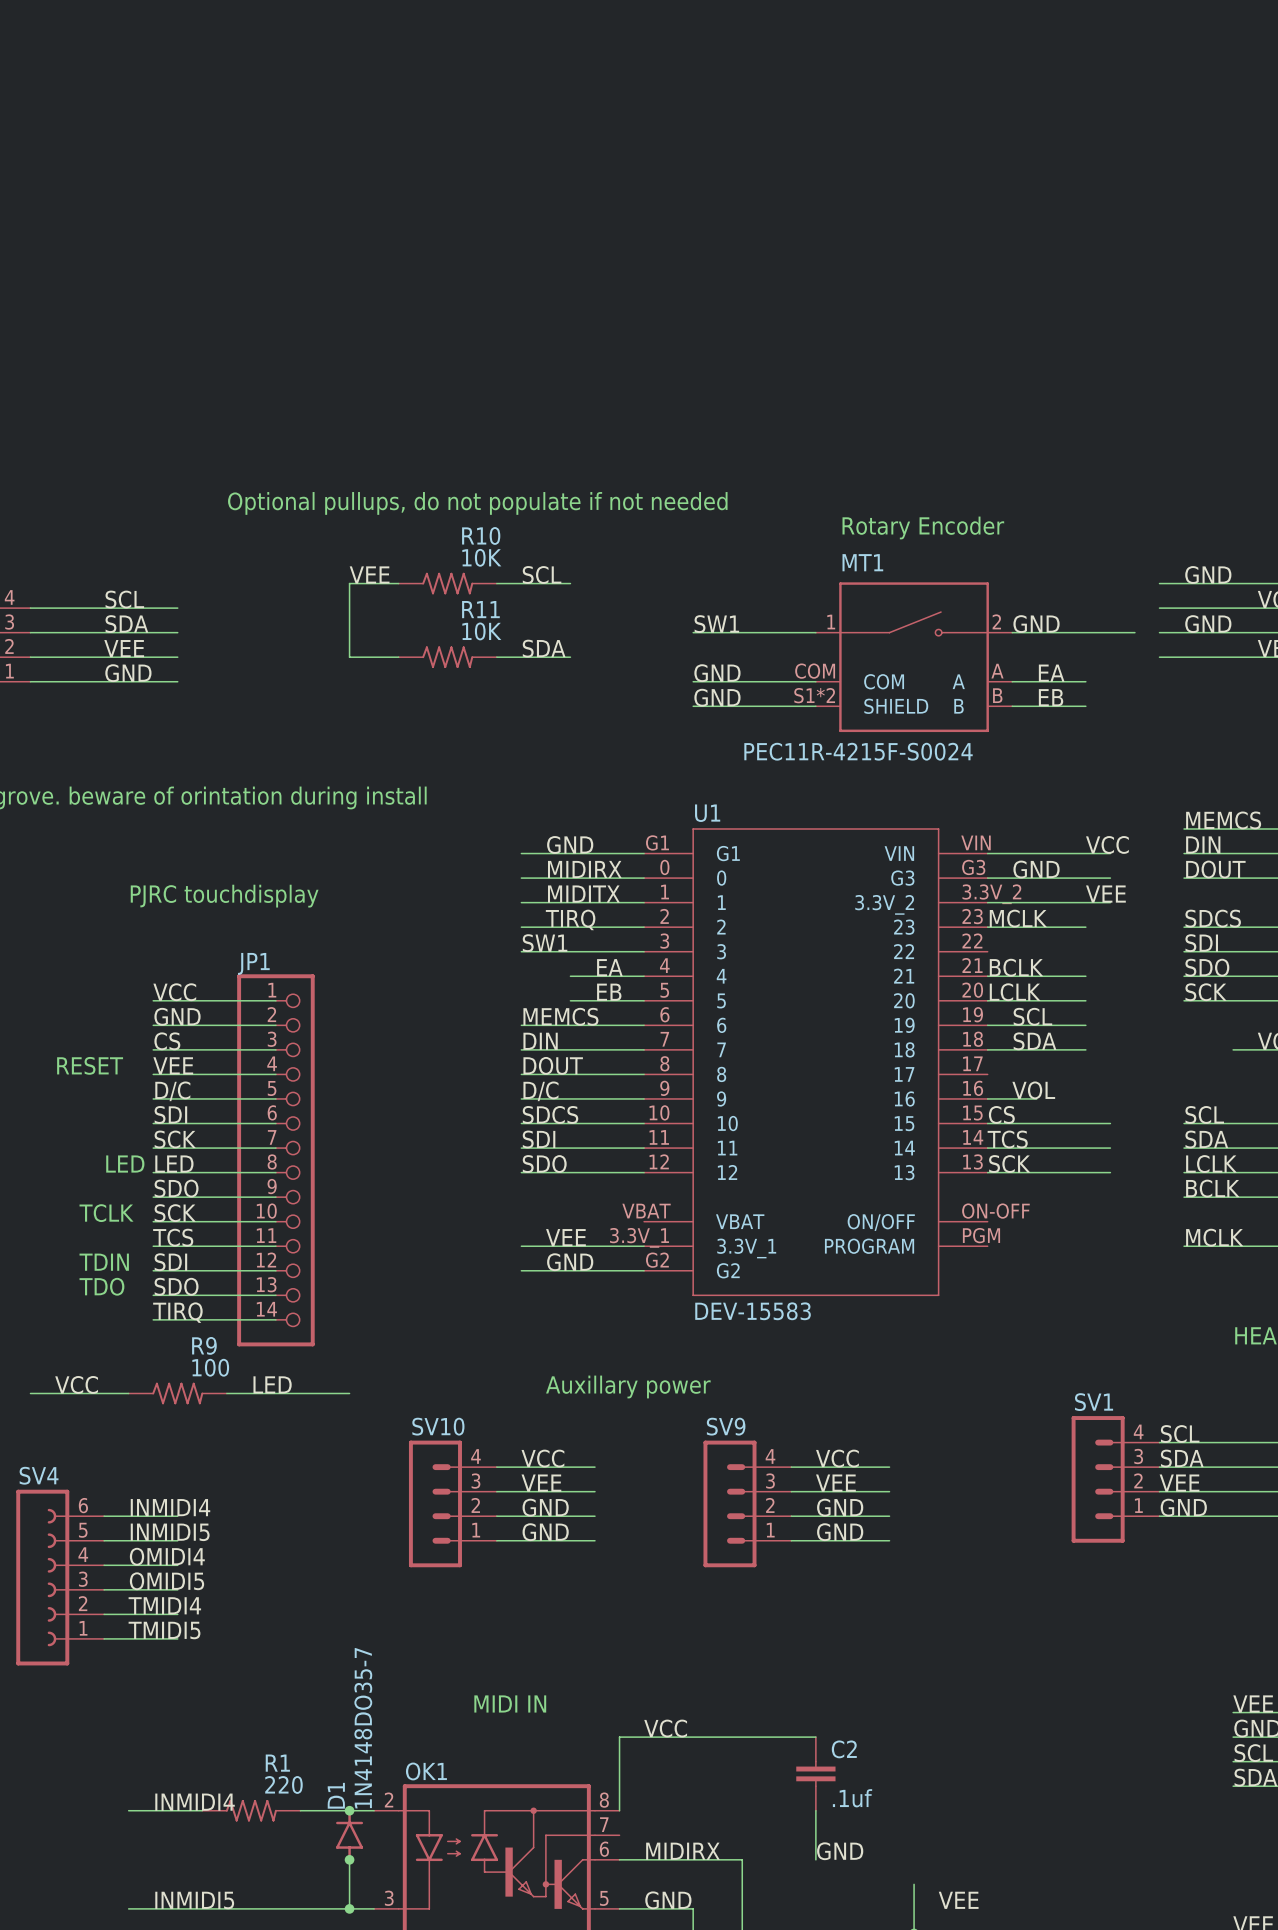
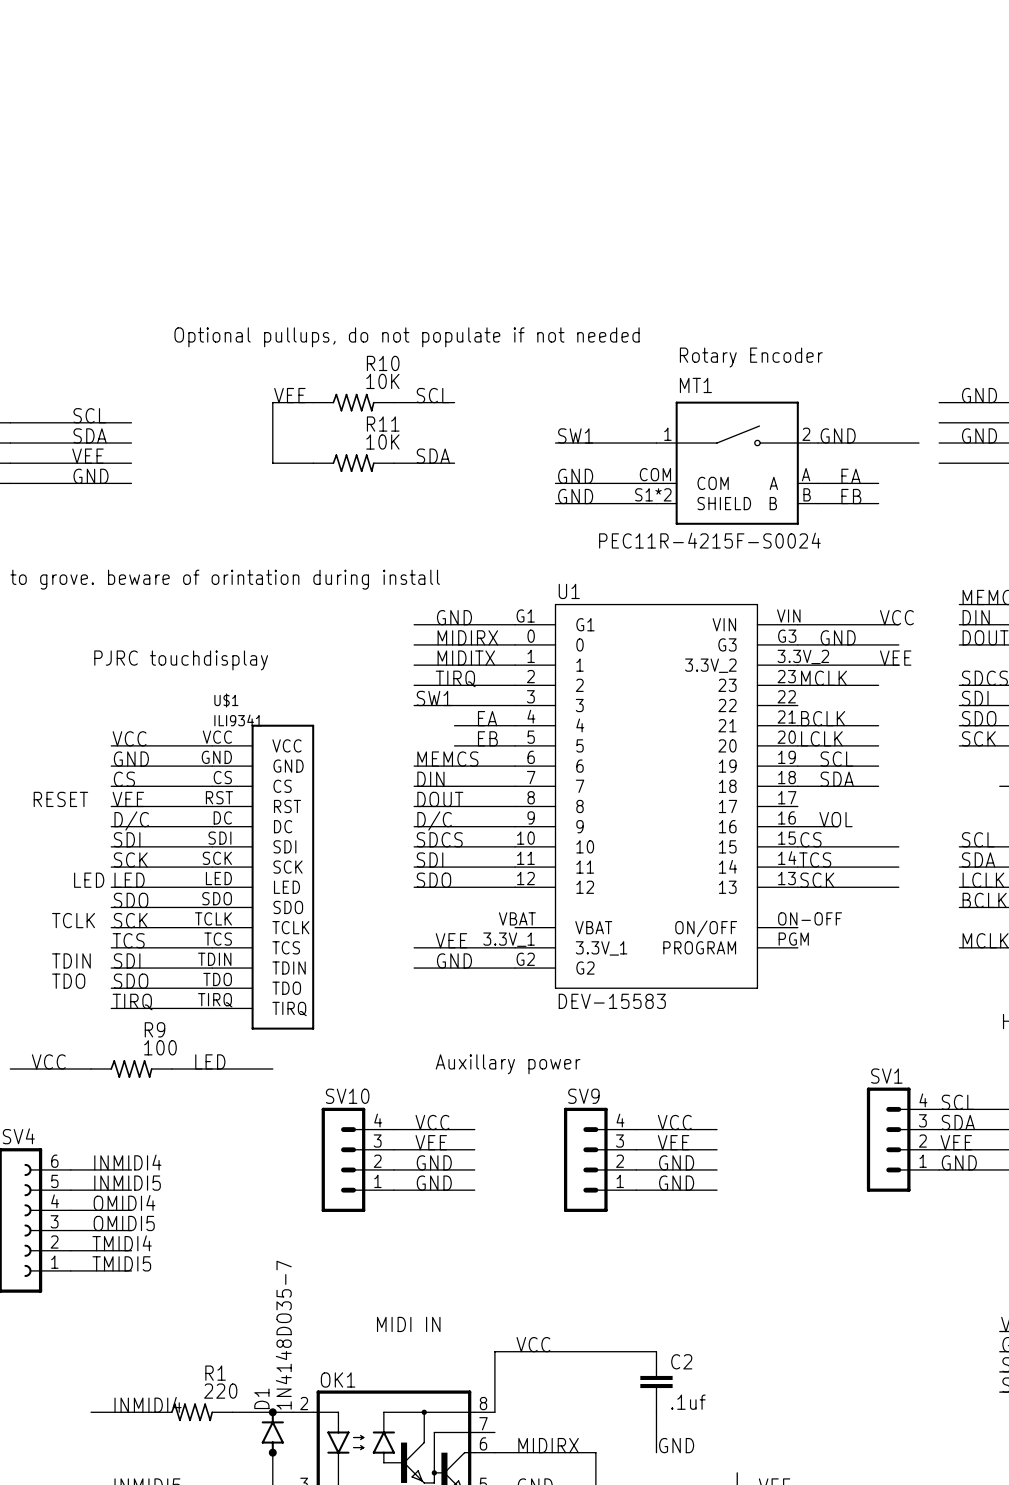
JP1: (275, 1160) -> none
U$1: none -> ILI9341 (263, 877)

